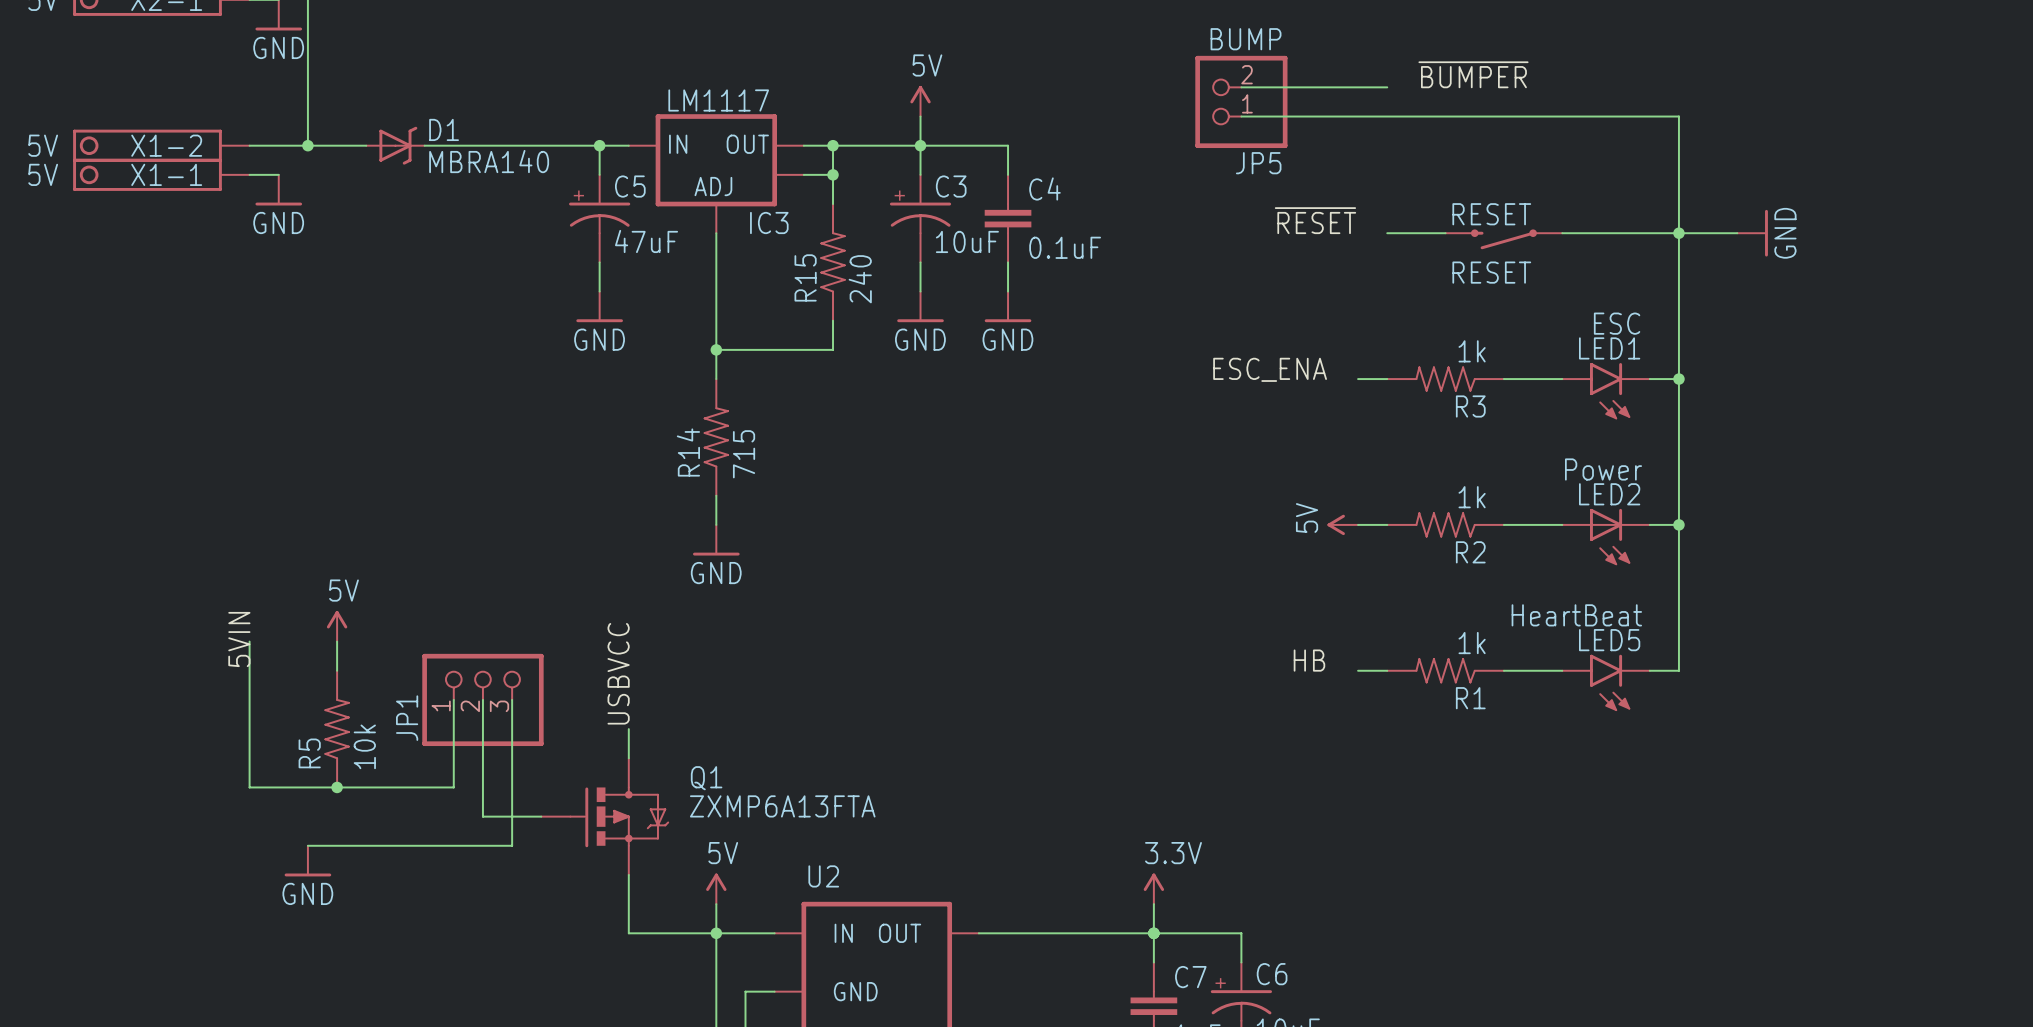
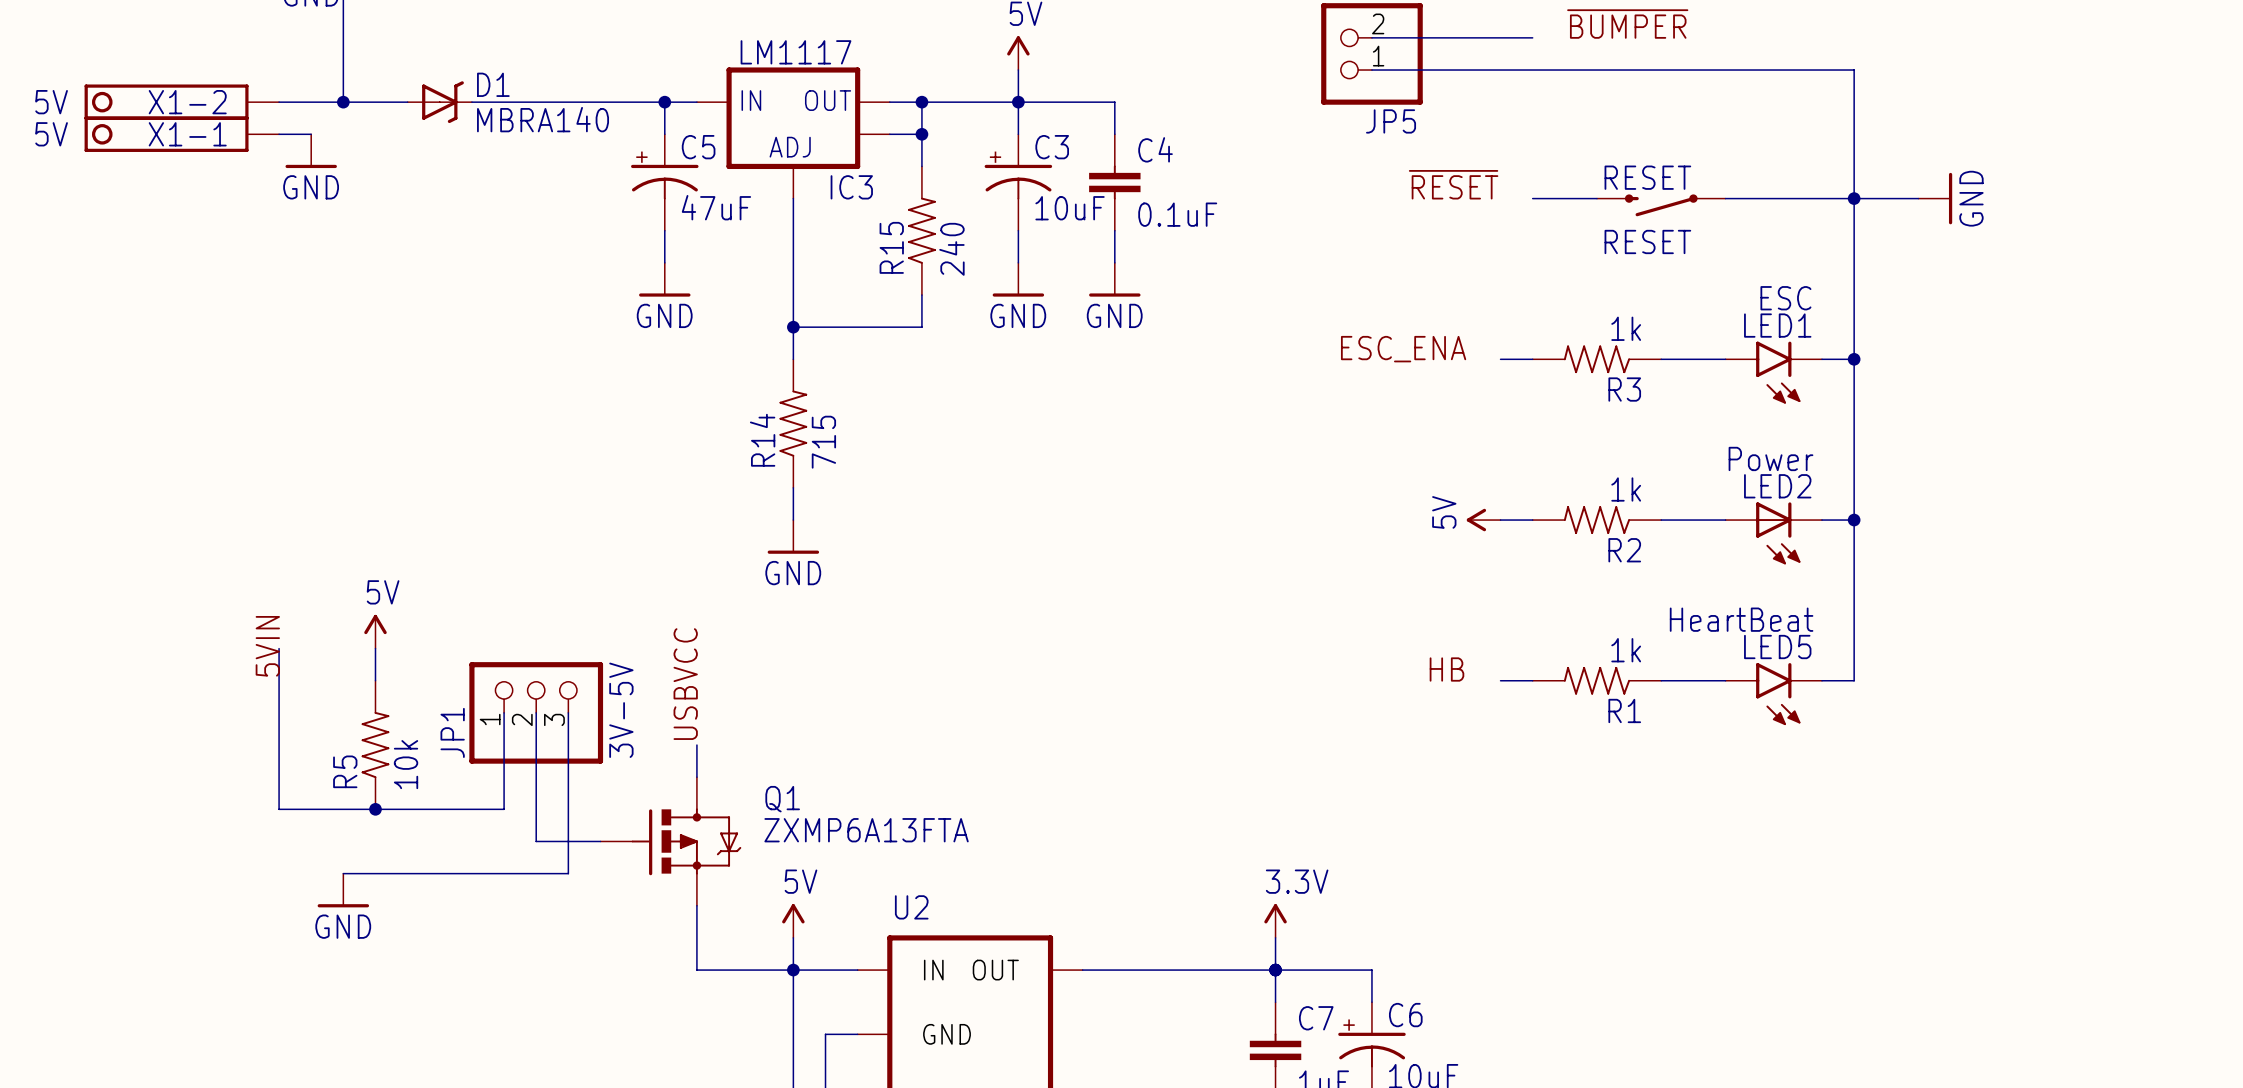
JP1 value: none -> 3V-5V (621, 710)

